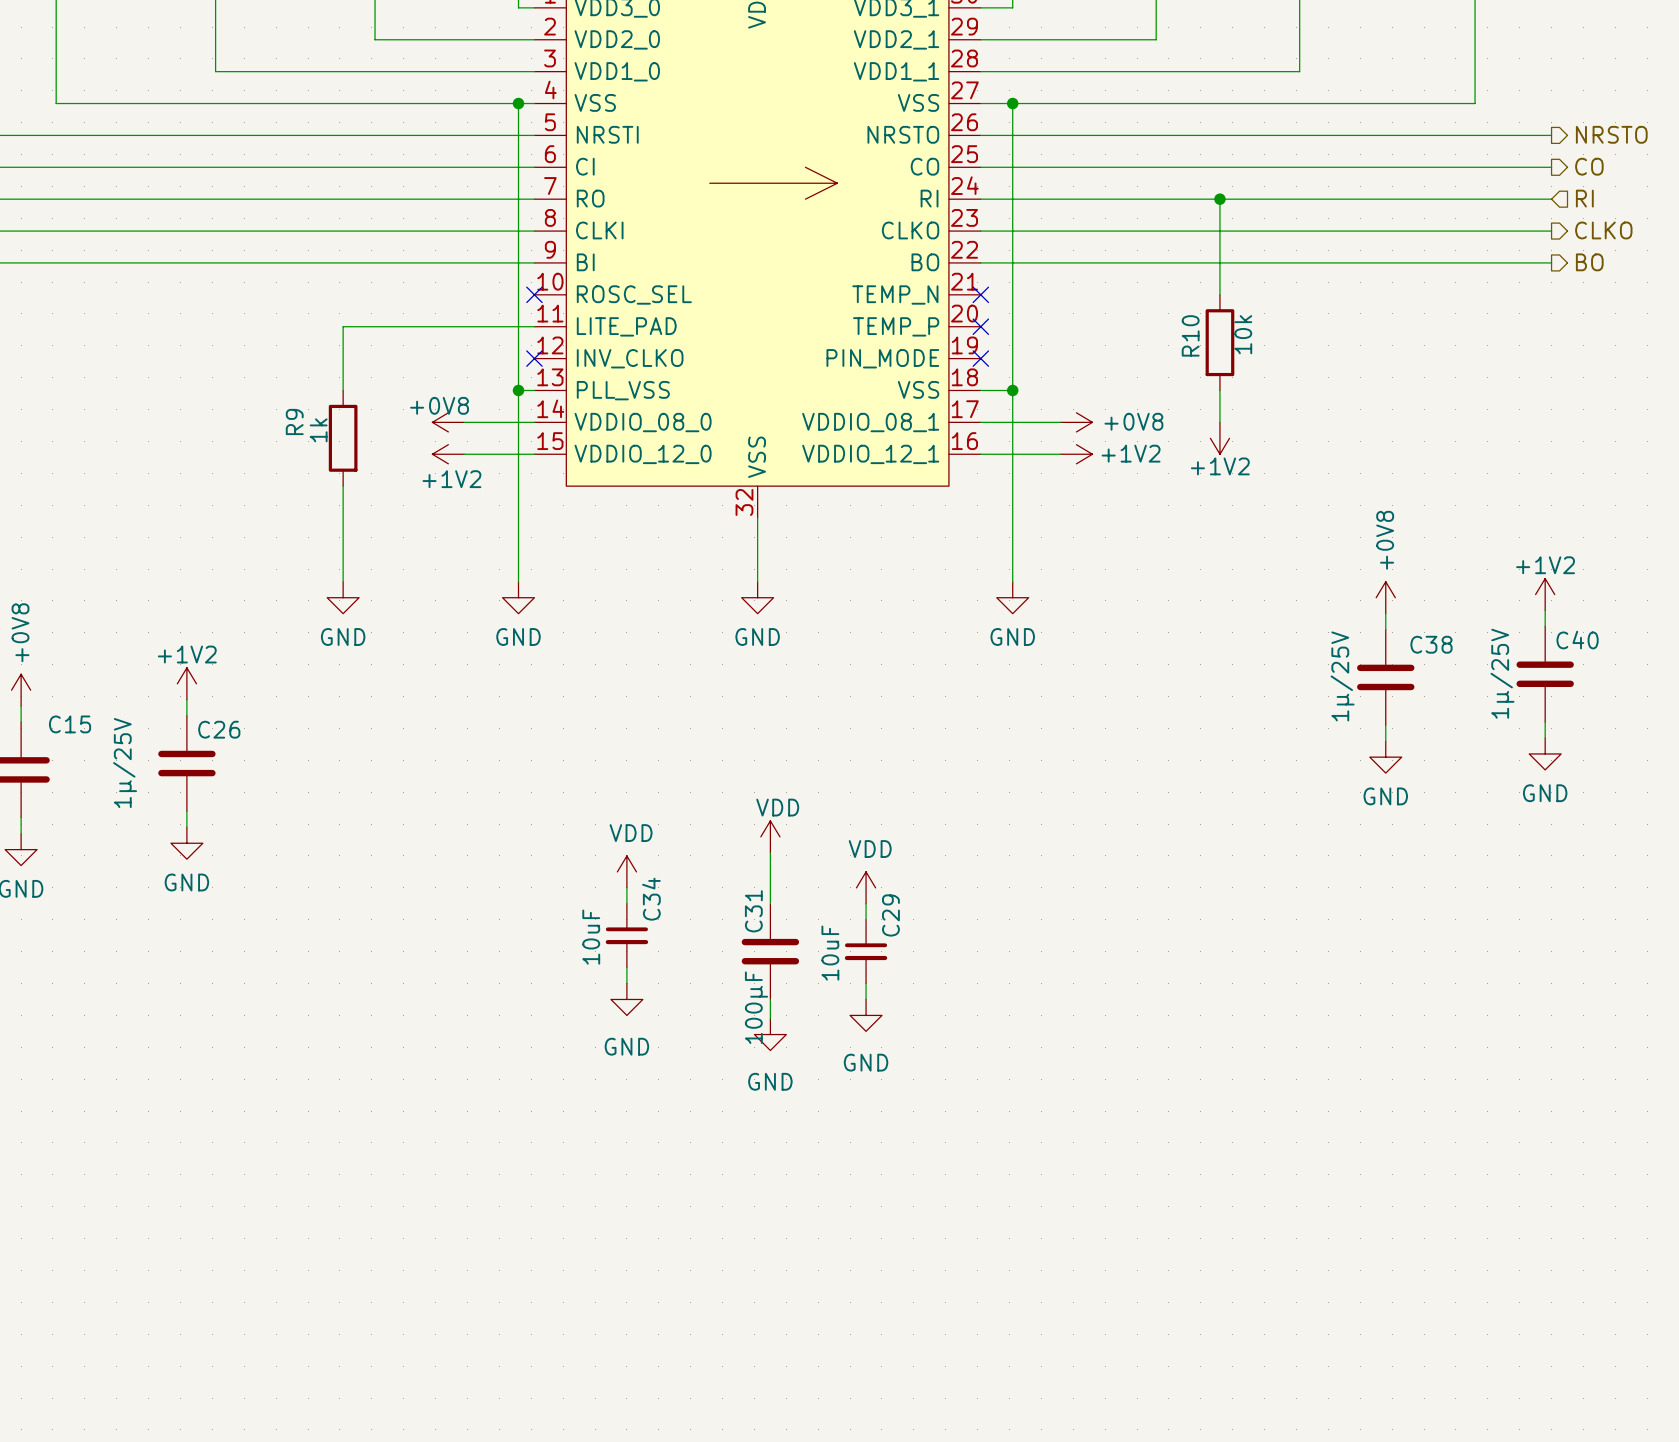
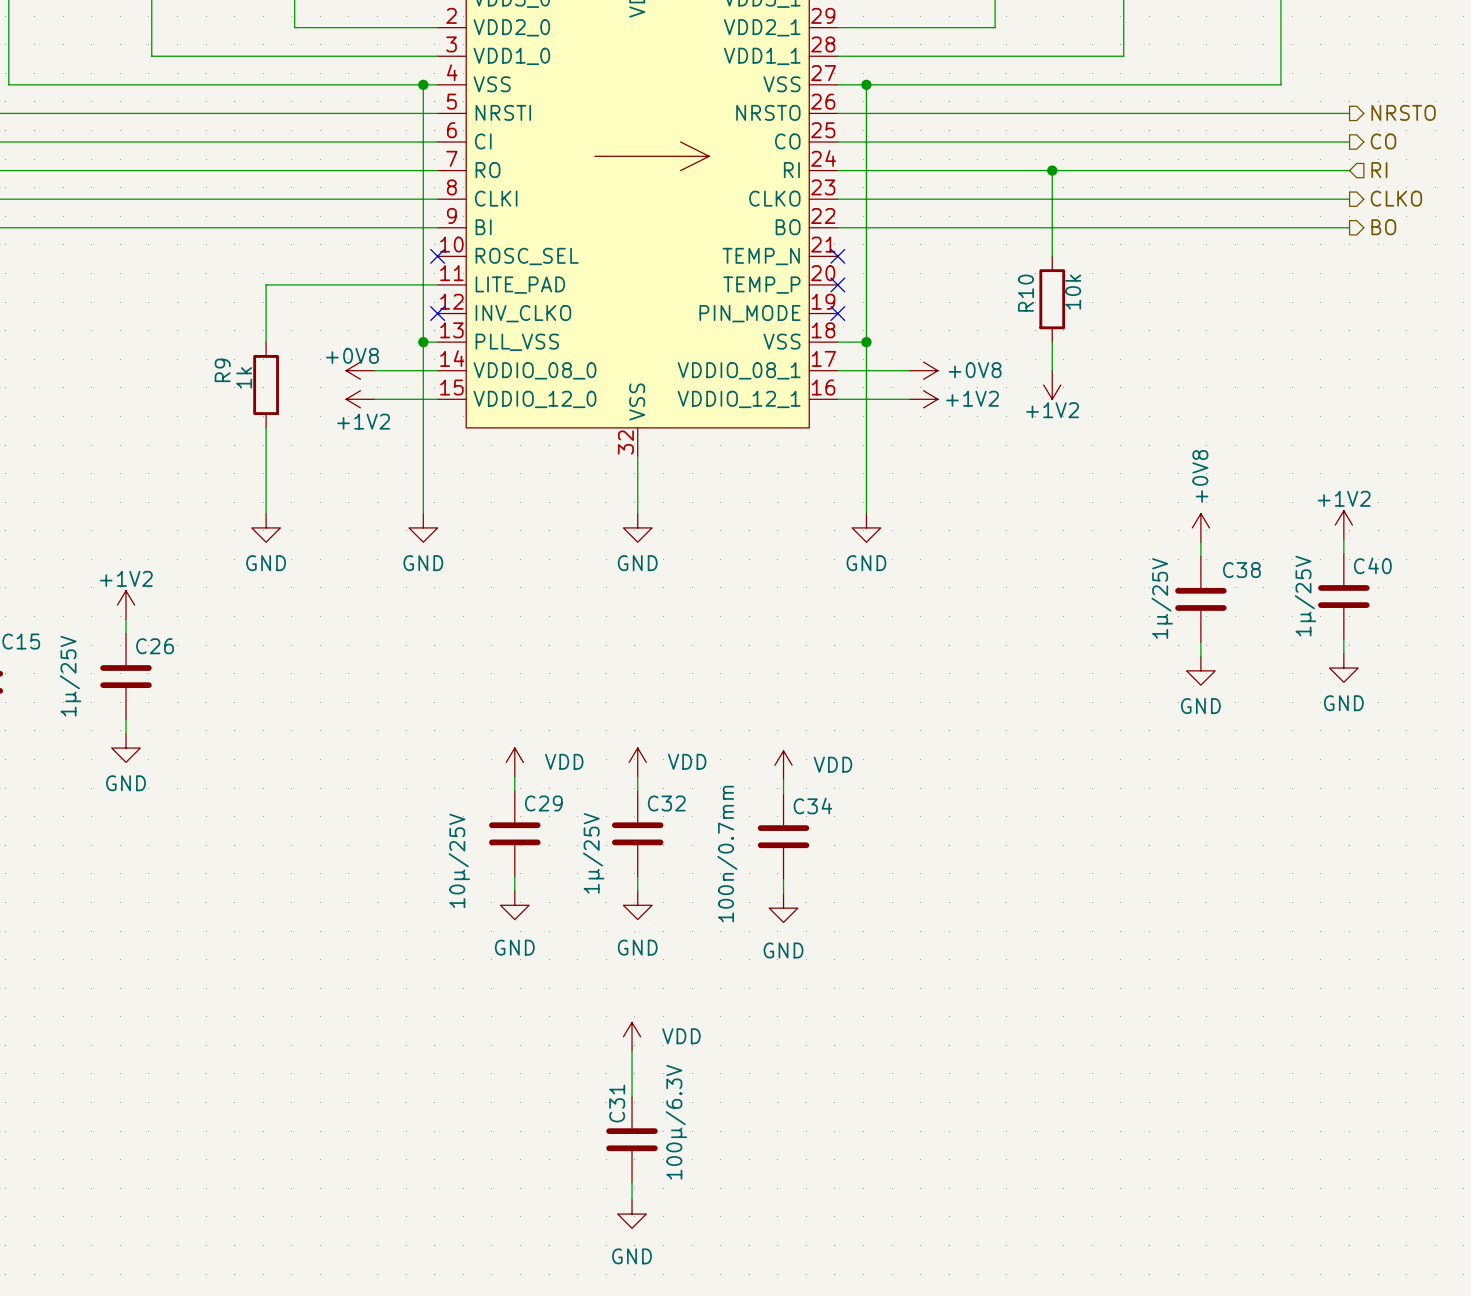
power symbol text position: VDD (777, 807) -> VDD (687, 761)
power symbol text position: VDD (631, 833) -> VDD (564, 761)
power symbol position: VDD (770, 836) -> VDD (637, 762)
wire: (770, 852) (770, 903) -> none
power symbol: none -> VDD (783, 765)
power symbol position: VDD (626, 871) -> VDD (514, 762)
wire: none -> (637, 776) (637, 790)
wire: (626, 887) (626, 903) -> (514, 776) (514, 790)
power symbol: VDD (866, 887) -> none
C34 symbol: [605, 903, 649, 968] -> [757, 793, 810, 880]
wire: (866, 903) (866, 919) -> (783, 779) (783, 793)
C29 symbol: [844, 919, 888, 984] -> [489, 790, 541, 877]
C34 value: 10uF (591, 937) -> 100n/0.7mm (727, 854)
C32: none -> 1µ/25V (637, 833)
C31 position: (770, 951) -> (632, 1139)
C29 value: 10uF (830, 953) -> 10µ/25V (459, 860)
wire: (626, 967) (626, 983) -> (514, 876) (514, 891)
wire: (866, 983) (866, 999) -> (783, 879) (783, 893)
wire: none -> (637, 876) (637, 891)
power symbol position: GND (626, 999) -> GND (514, 905)
wire: (770, 999) (770, 1018) -> none
C31 value: 100µF (756, 1007) -> 100µ/6.3V (676, 1122)
power symbol: GND (866, 1015) -> none
power symbol: none -> GND (783, 908)
power symbol position: GND (770, 1034) -> GND (637, 905)
power symbol: none -> VDD (632, 1036)
wire: none -> (632, 1051) (632, 1096)
wire: none -> (632, 1182) (632, 1199)
power symbol: none -> GND (632, 1214)

